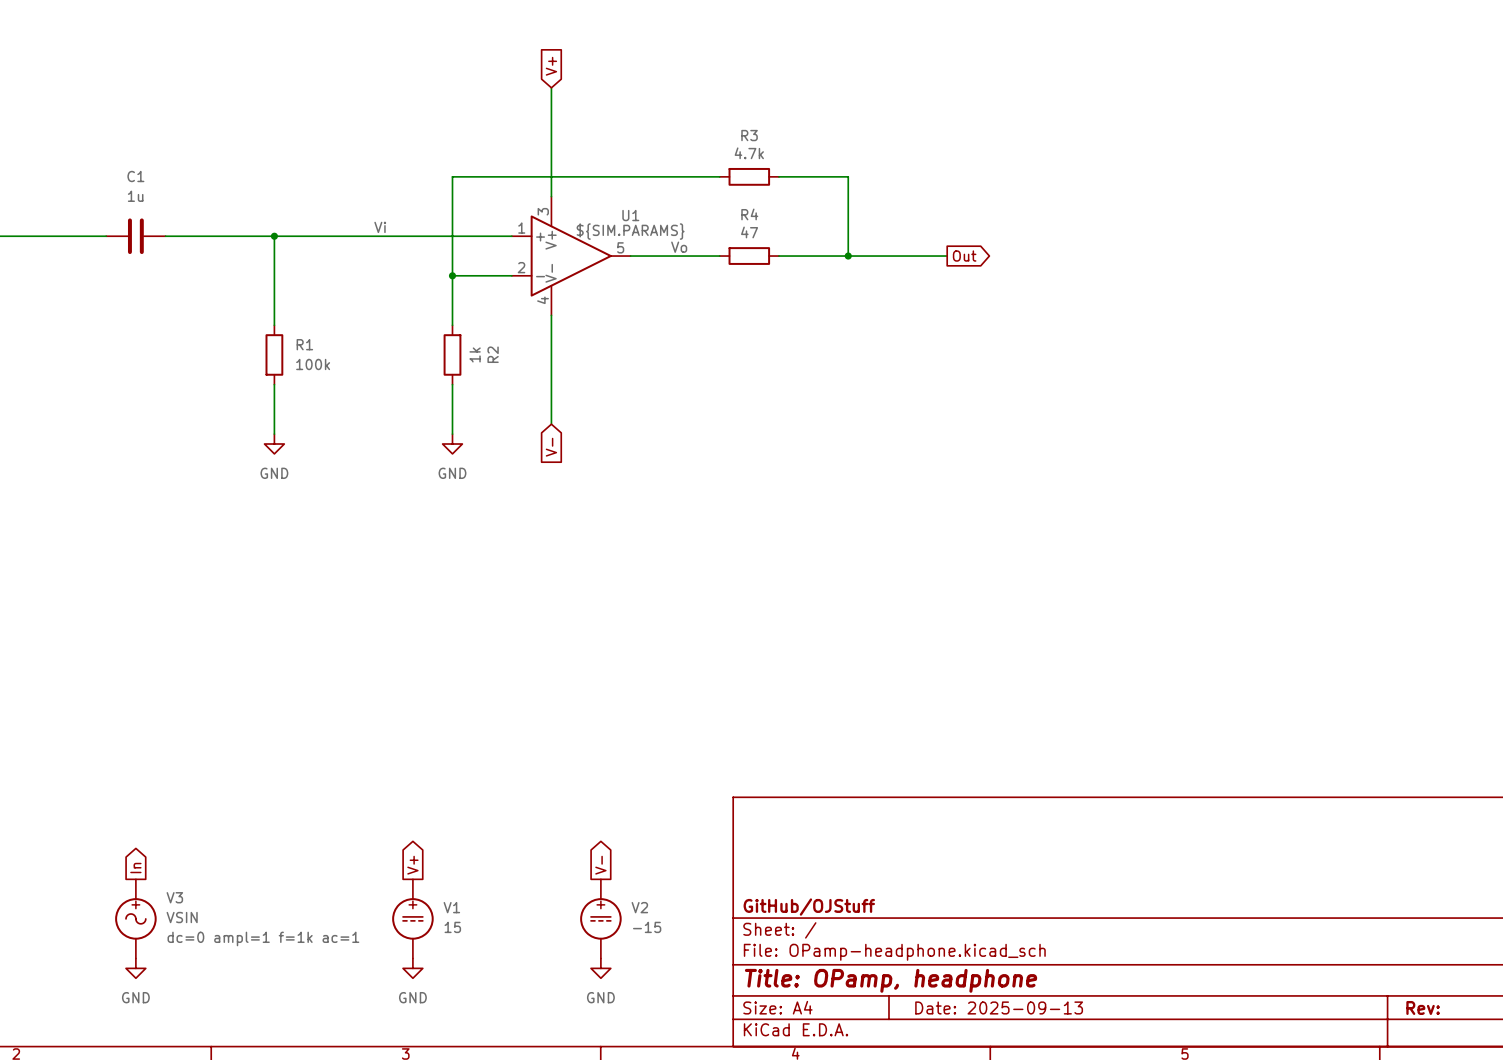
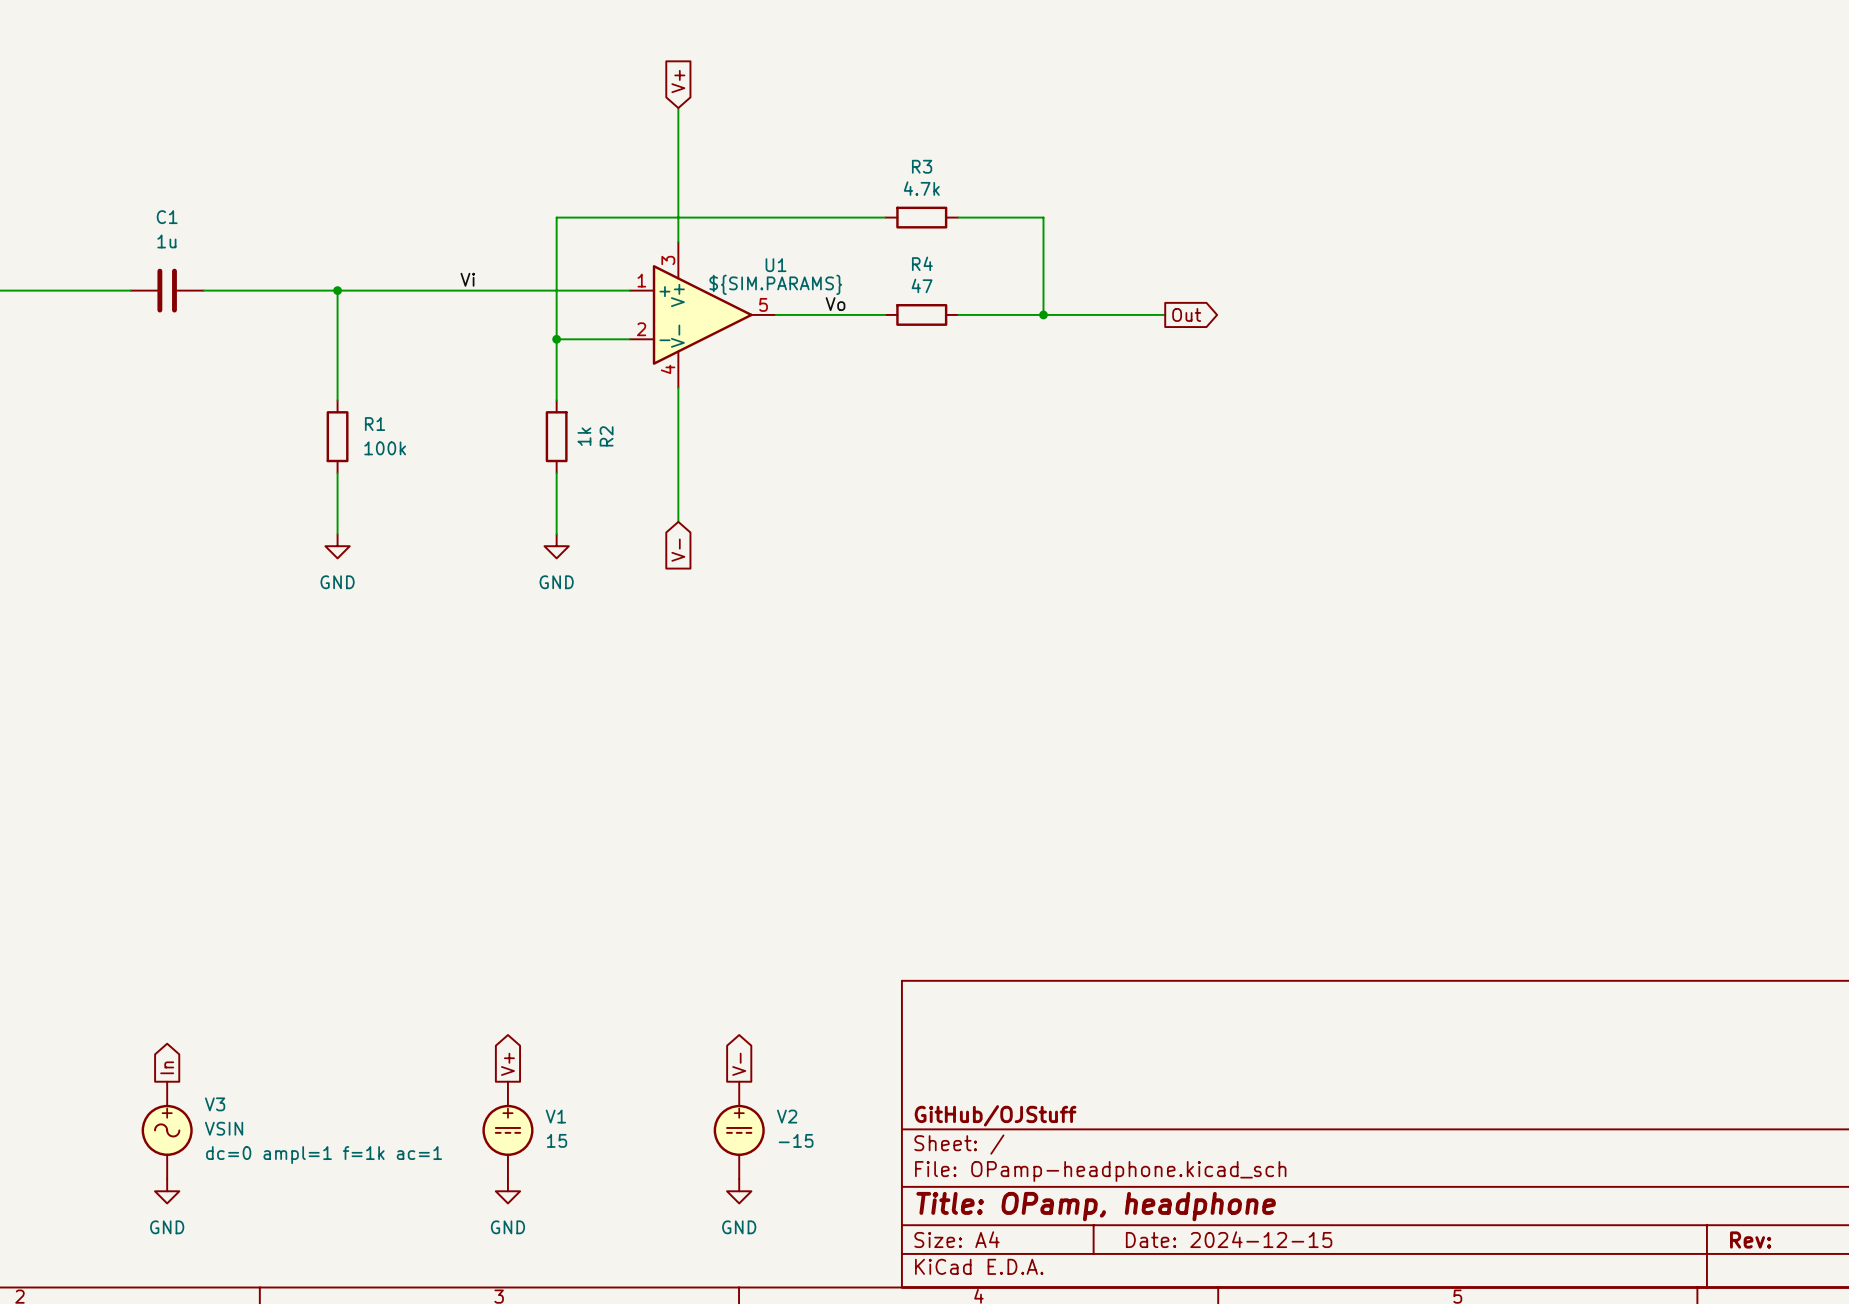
title block: Date: 2025-09-13 (999, 1007) -> Date: 2024-12-15 (1229, 1239)

